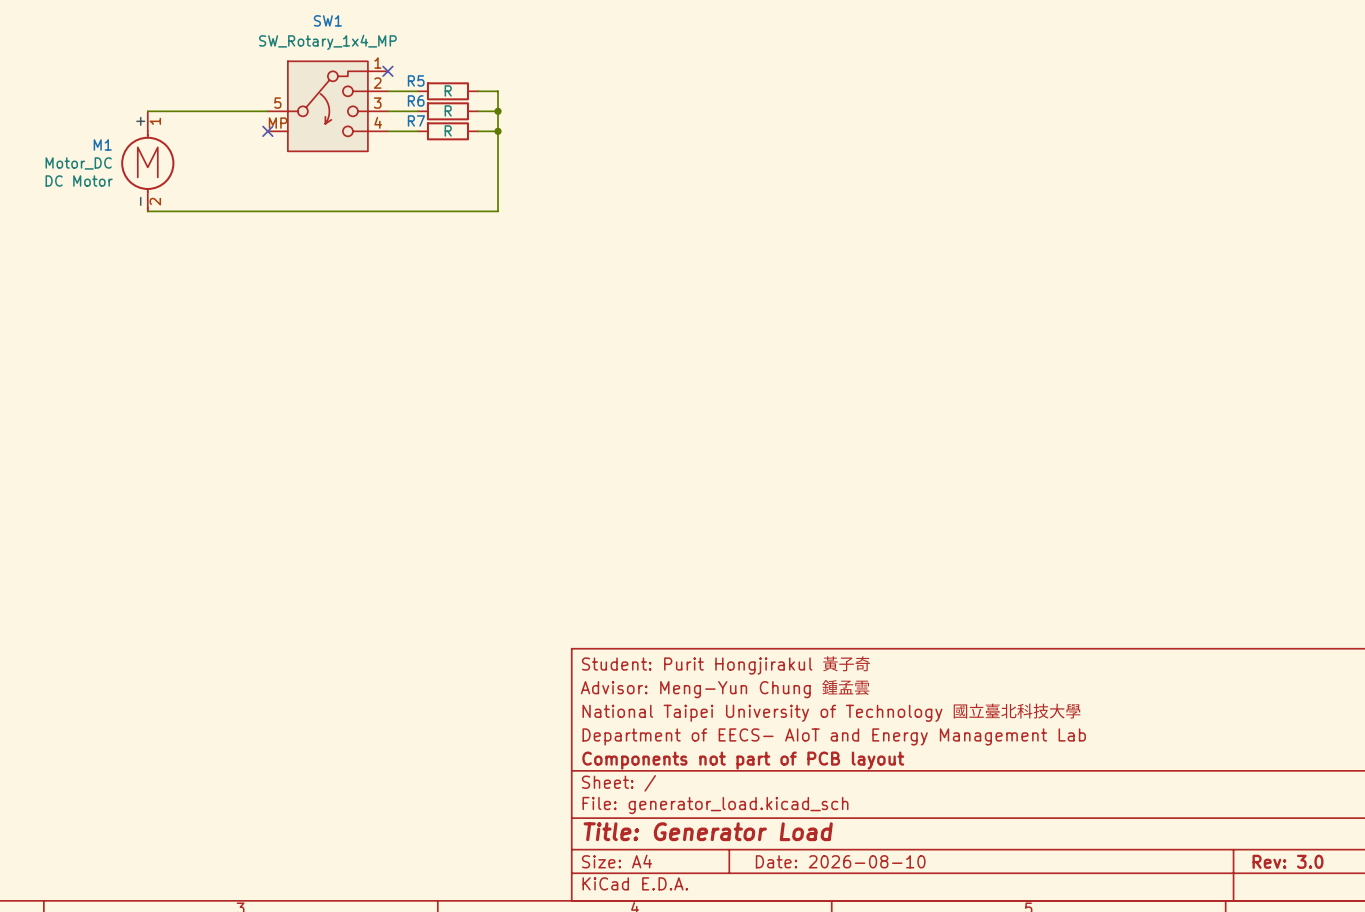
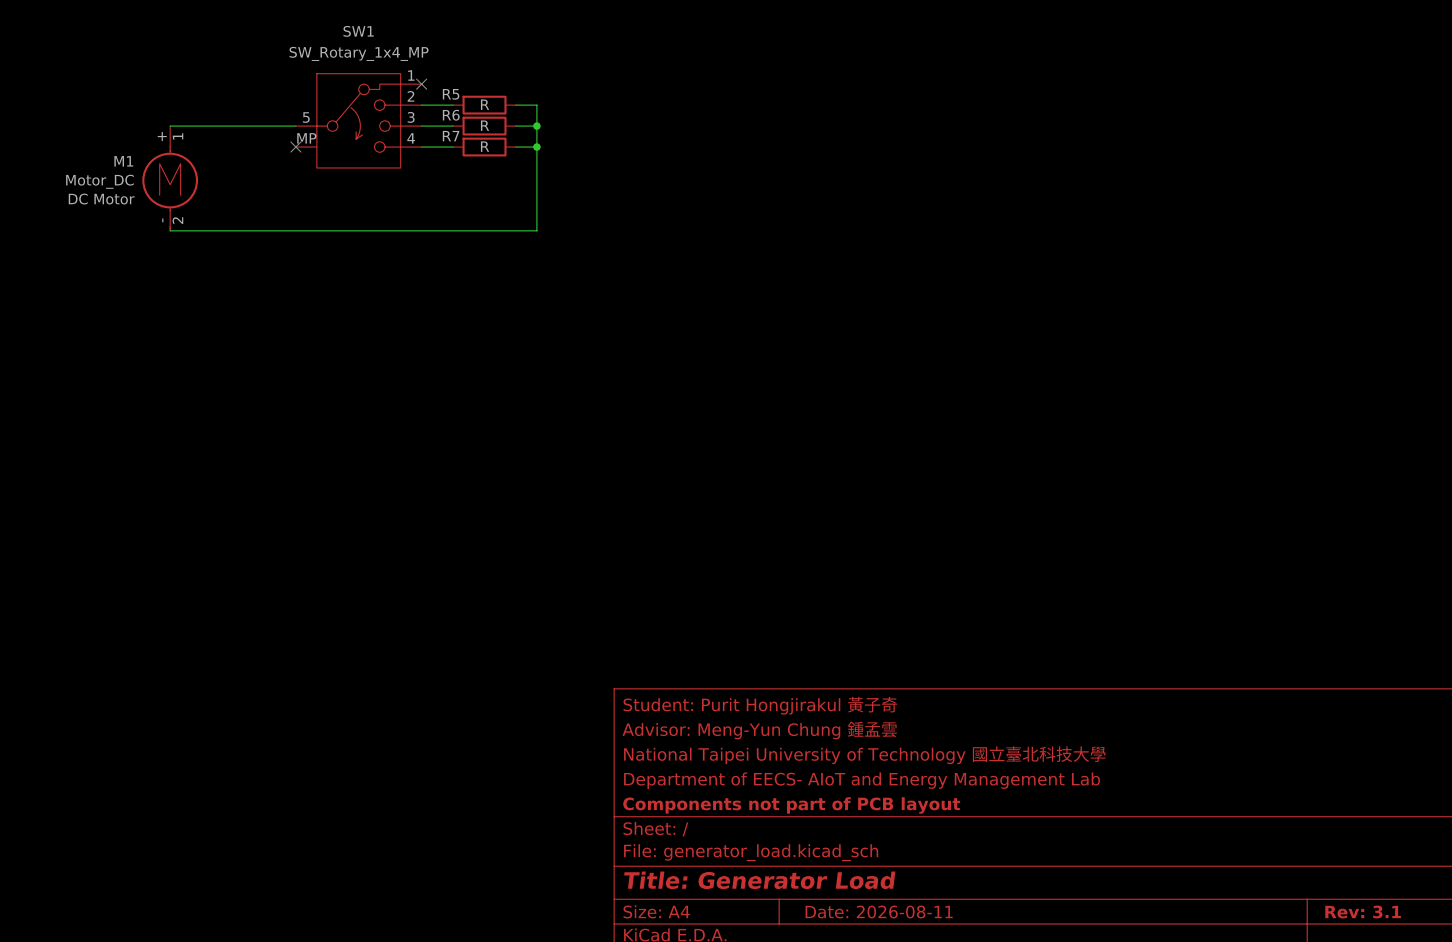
title block: Date: 2026-08-10 (840, 861) -> Date: 2026-08-11 (879, 912)
title block: Rev: 3.0 (1288, 861) -> Rev: 3.1 (1363, 912)

